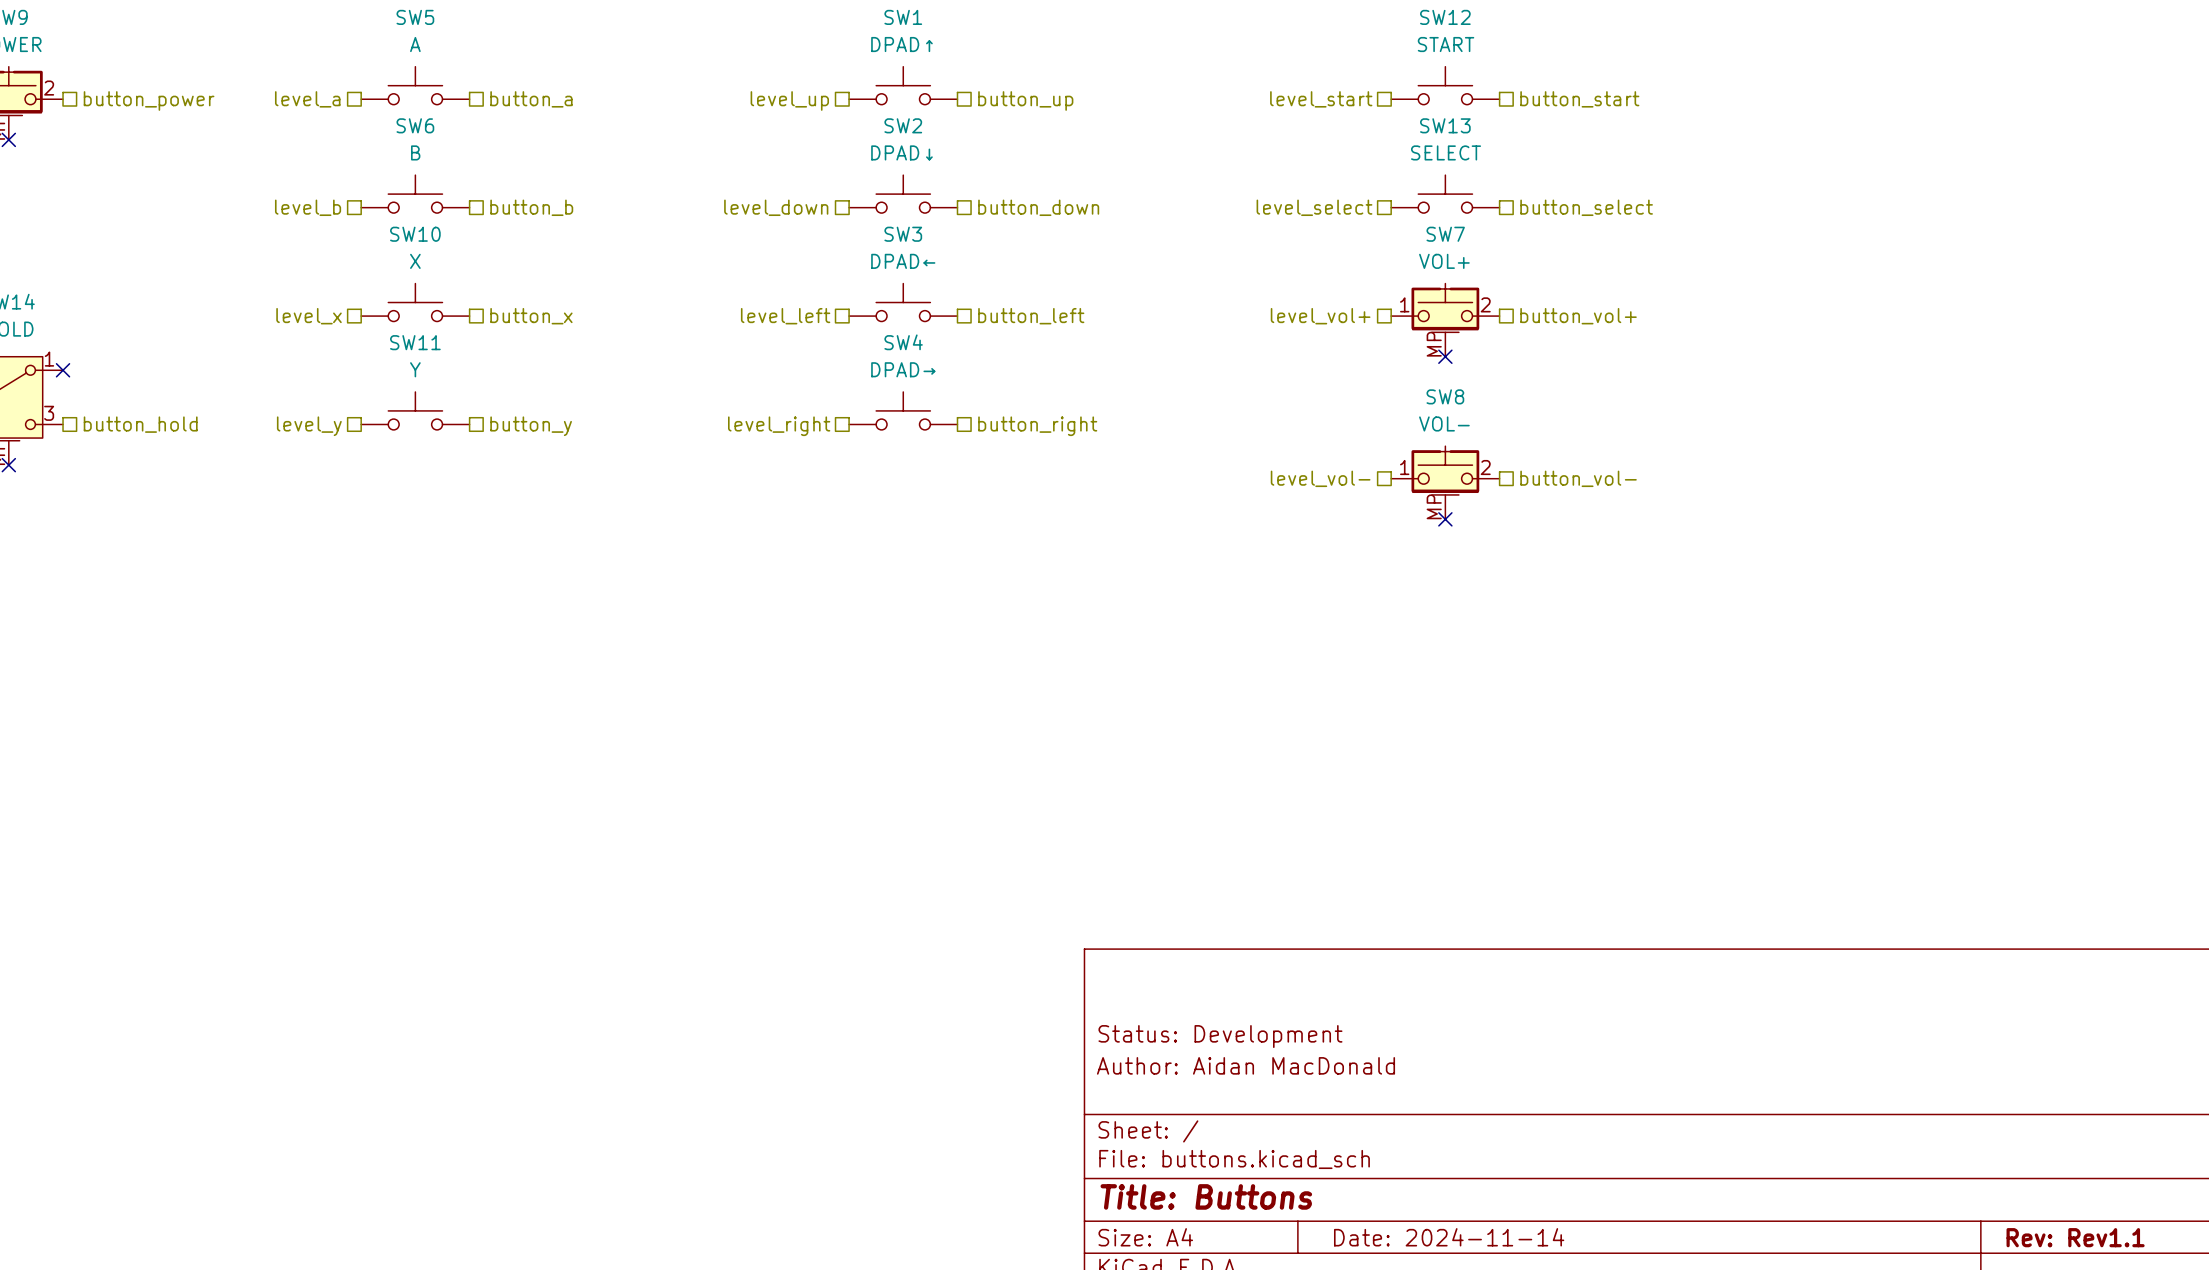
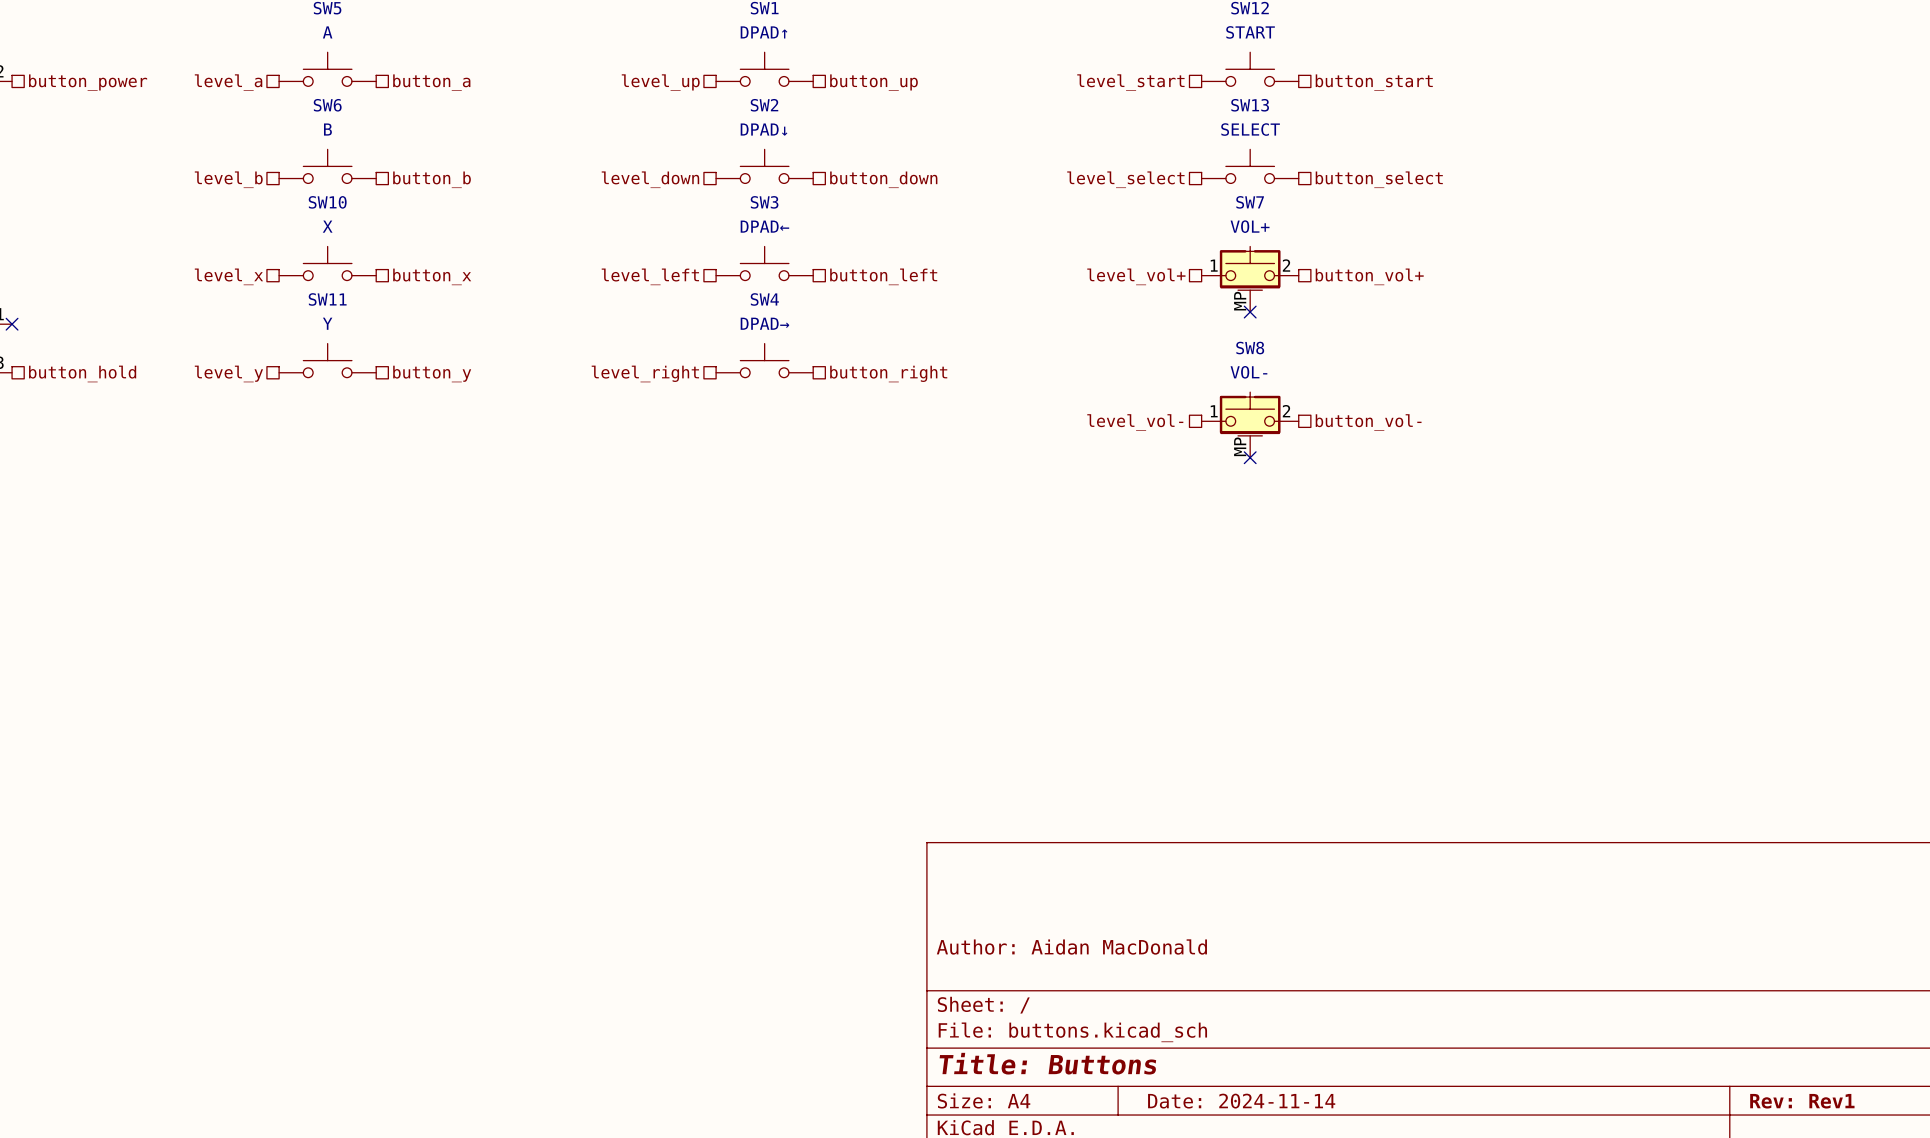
title block: Status: Development (1220, 1036) -> none
title block: Rev: Rev1.1 (2075, 1237) -> Rev: Rev1 (1802, 1101)

